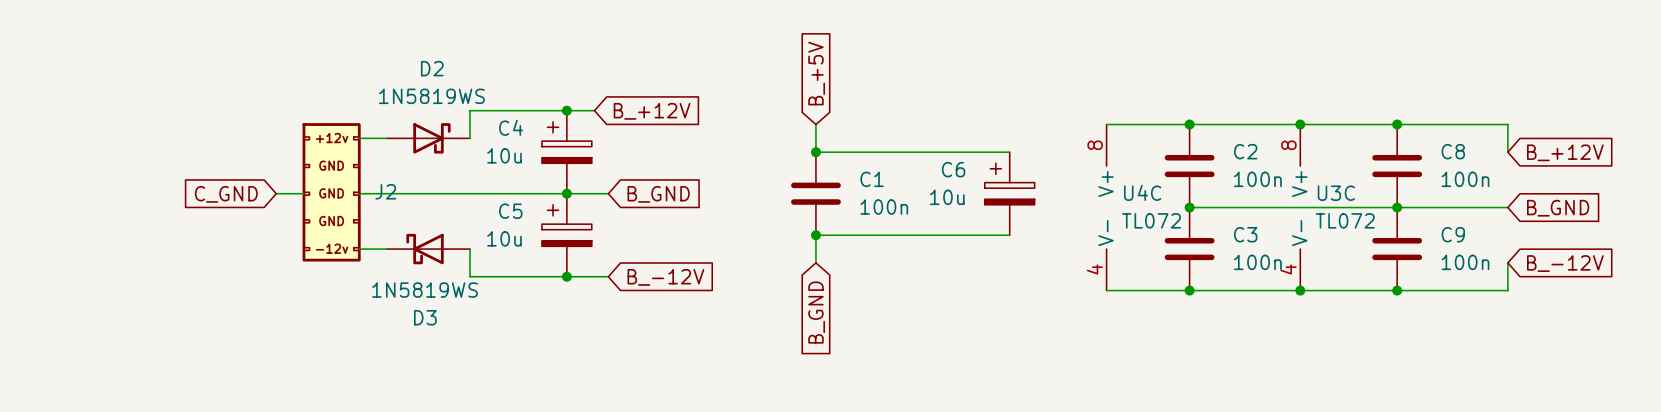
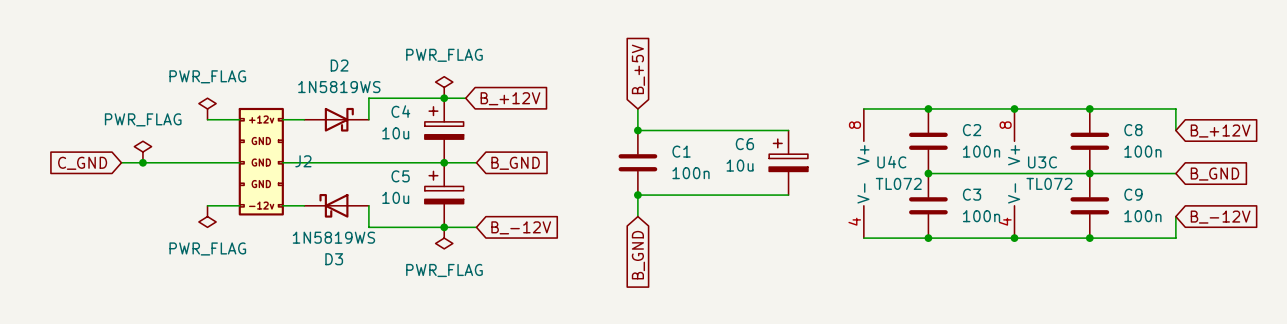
power symbol: none -> PWR_FLAG (444, 87)
power symbol: none -> PWR_FLAG (207, 108)
wire: none -> (207, 119) (239, 119)
power symbol: none -> PWR_FLAG (142, 152)
wire: none -> (121, 162) (218, 162)
junction: none -> (142, 162)
global label position: C_GND (226, 194) -> C_GND (82, 163)
wire: none -> (207, 205) (239, 205)
power symbol: none -> PWR_FLAG (207, 216)
power symbol: none -> PWR_FLAG (444, 238)

